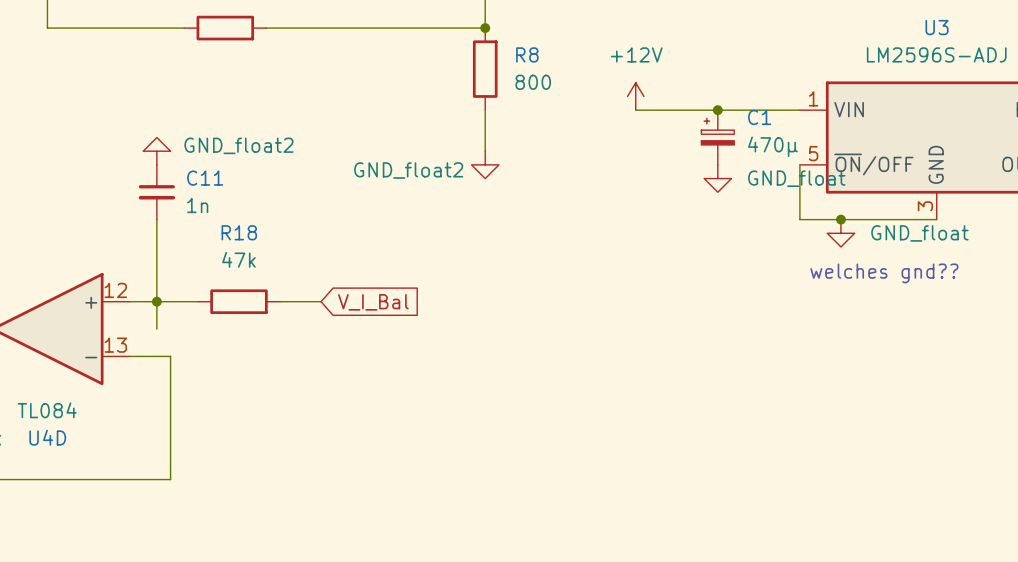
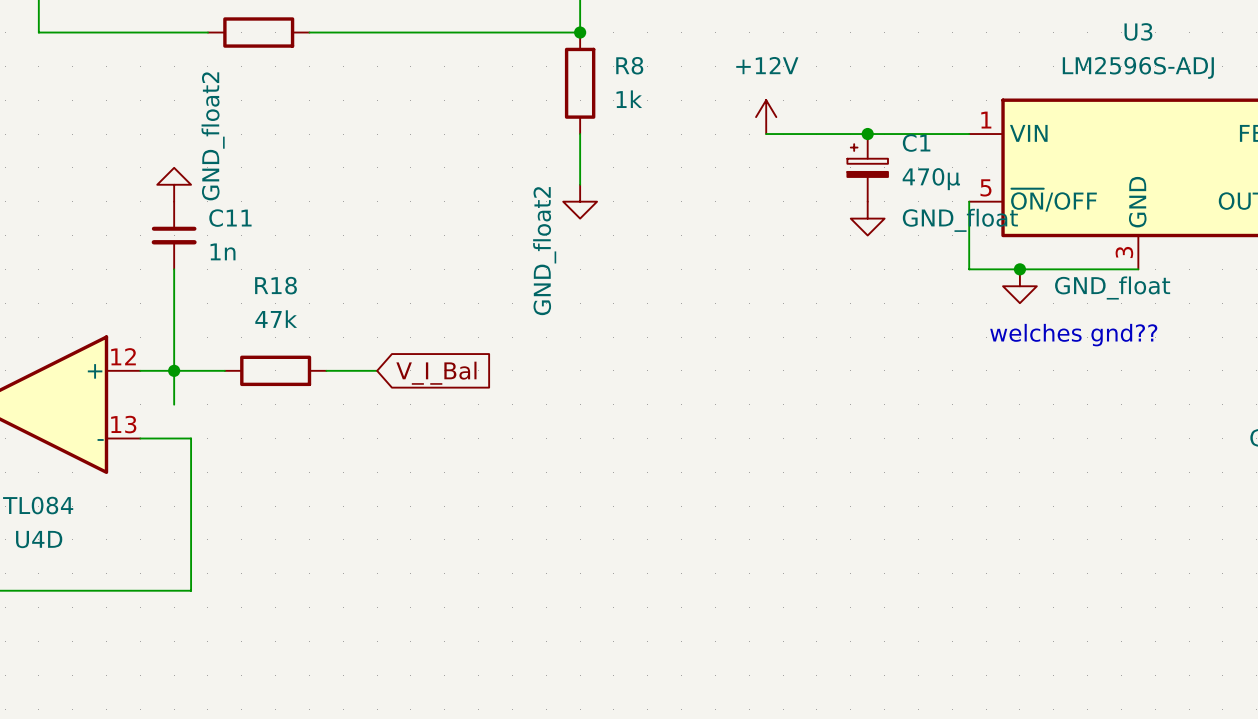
R8 value: 800 (533, 82) -> 1k (629, 99)
power symbol text rotation: 0° (238, 145) -> 90° counterclockwise (213, 136)
power symbol text rotation: 0° (408, 170) -> 90° counterclockwise (544, 251)

